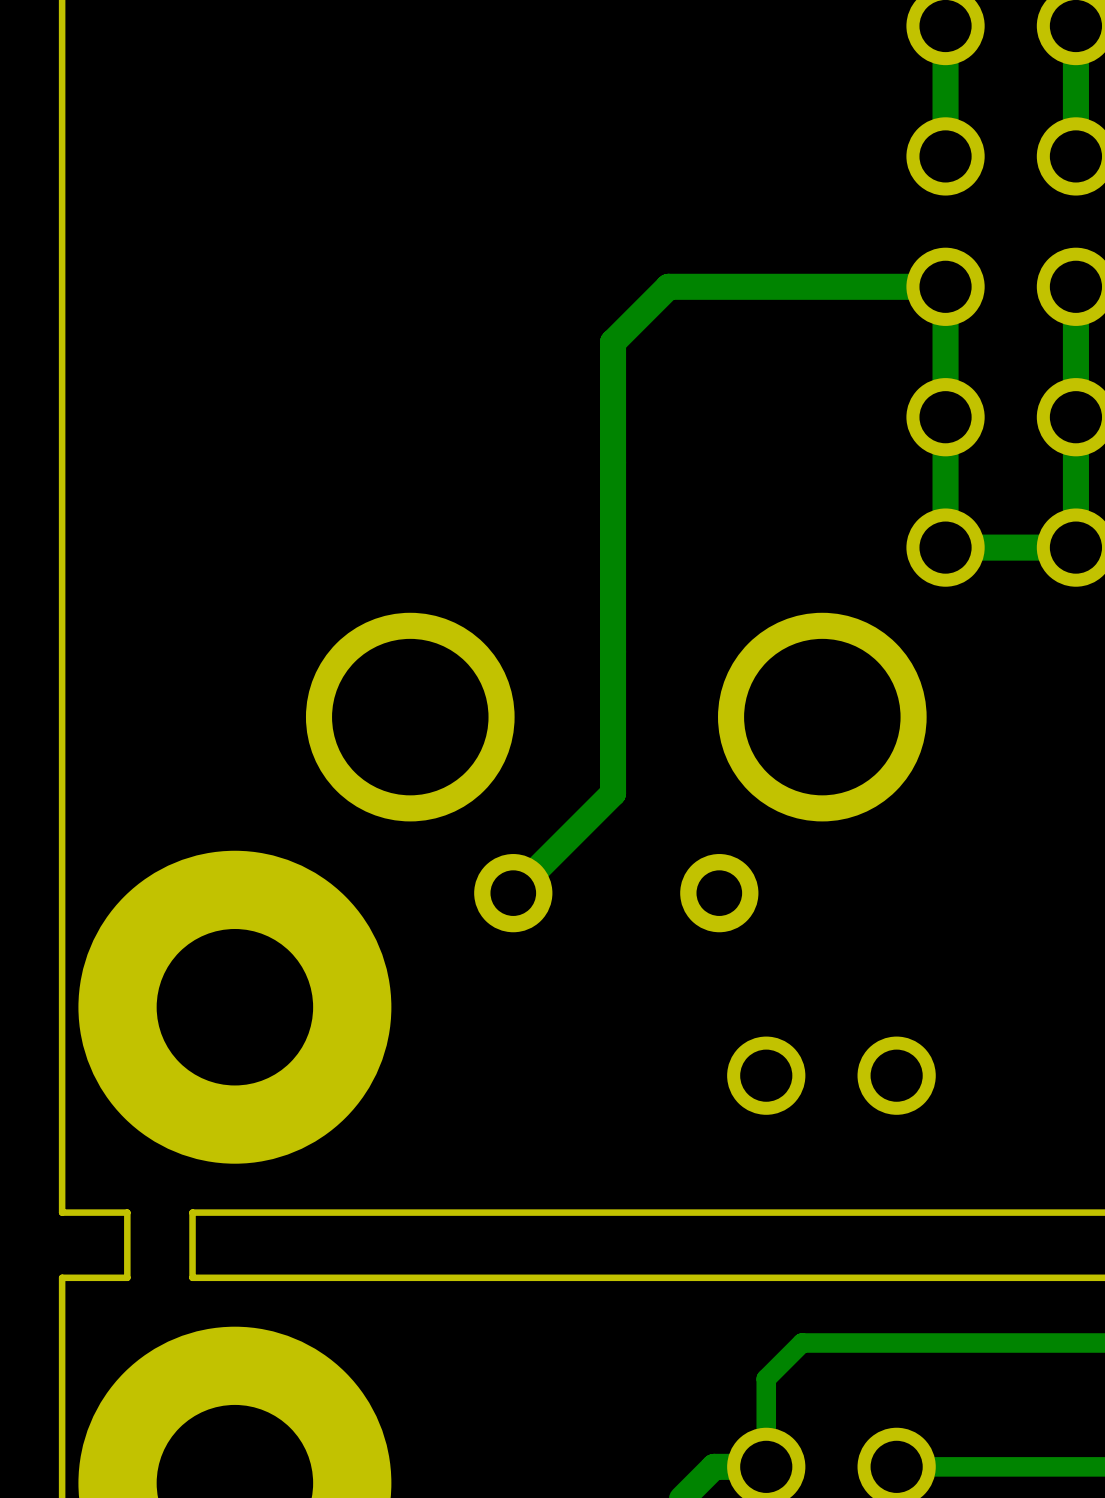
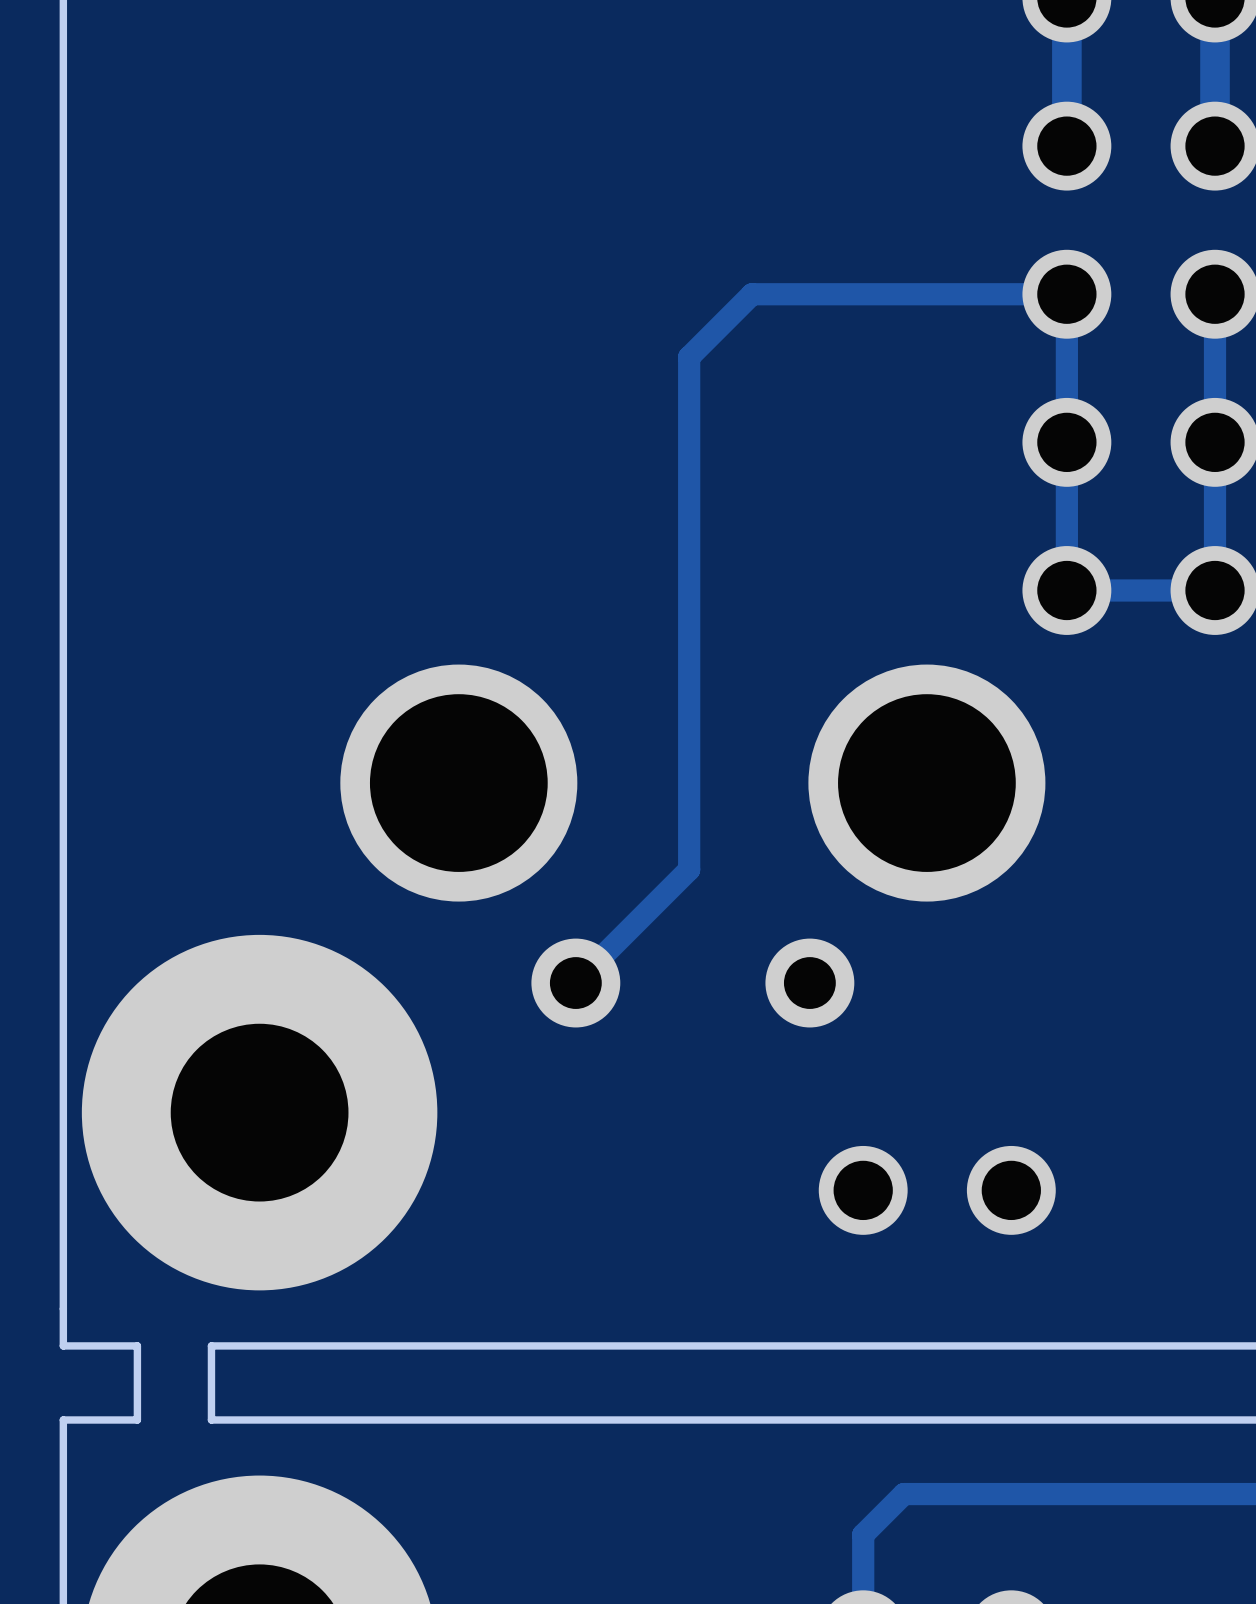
track width: thick (1075, 286) (1075, 547) (945, 547) (945, 286) (668, 286) (613, 342) (613, 793) (513, 893) -> thin (1215, 294) (1215, 590) (1066, 590) (1066, 294) (752, 294) (689, 357) (689, 869) (575, 983)

